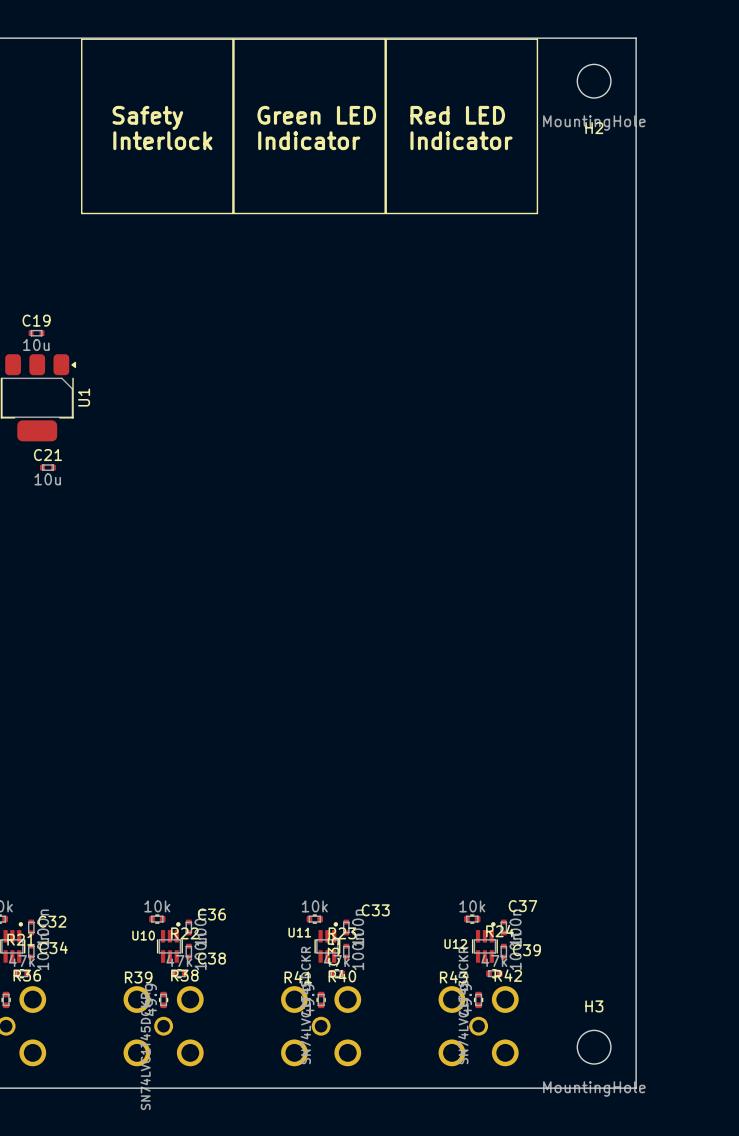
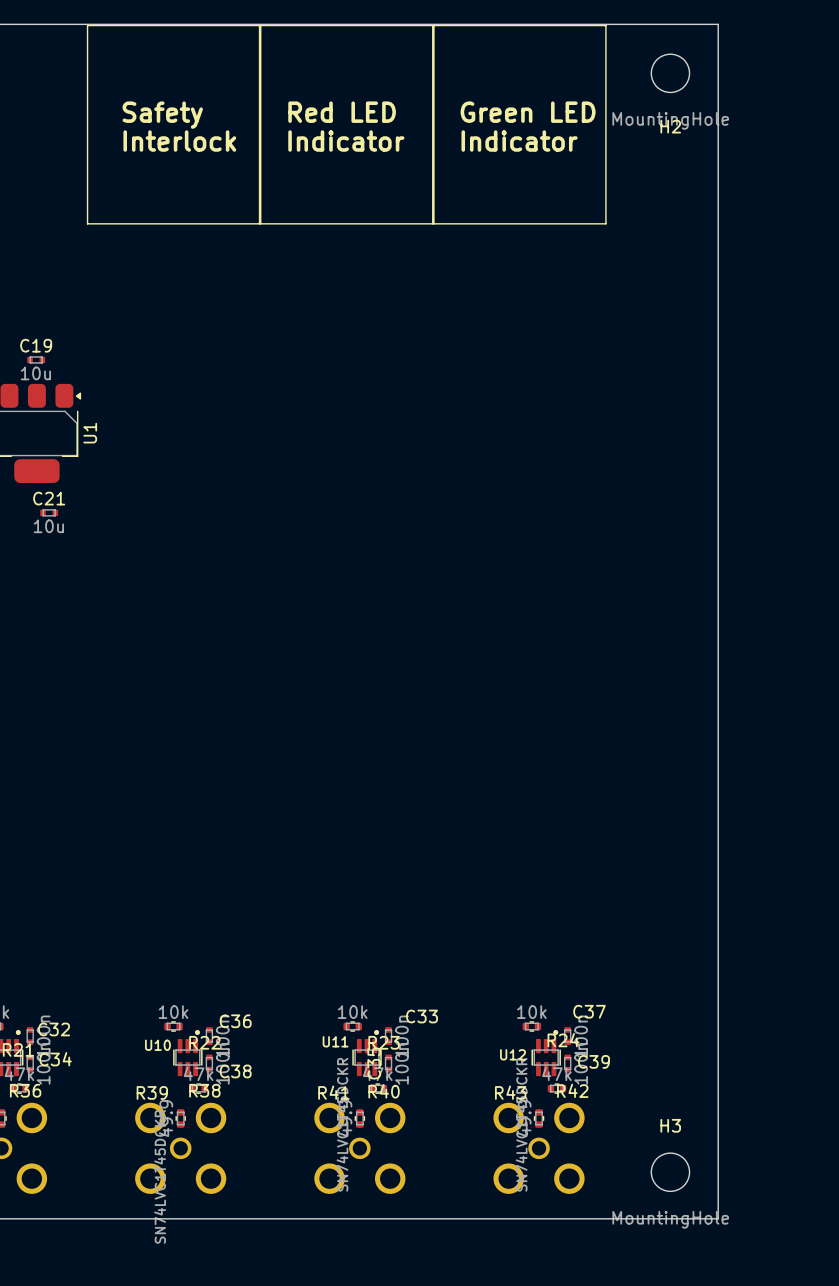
text: Green LED (316, 115) -> Red LED (342, 112)
text: Red LED (457, 115) -> Green LED (528, 112)

